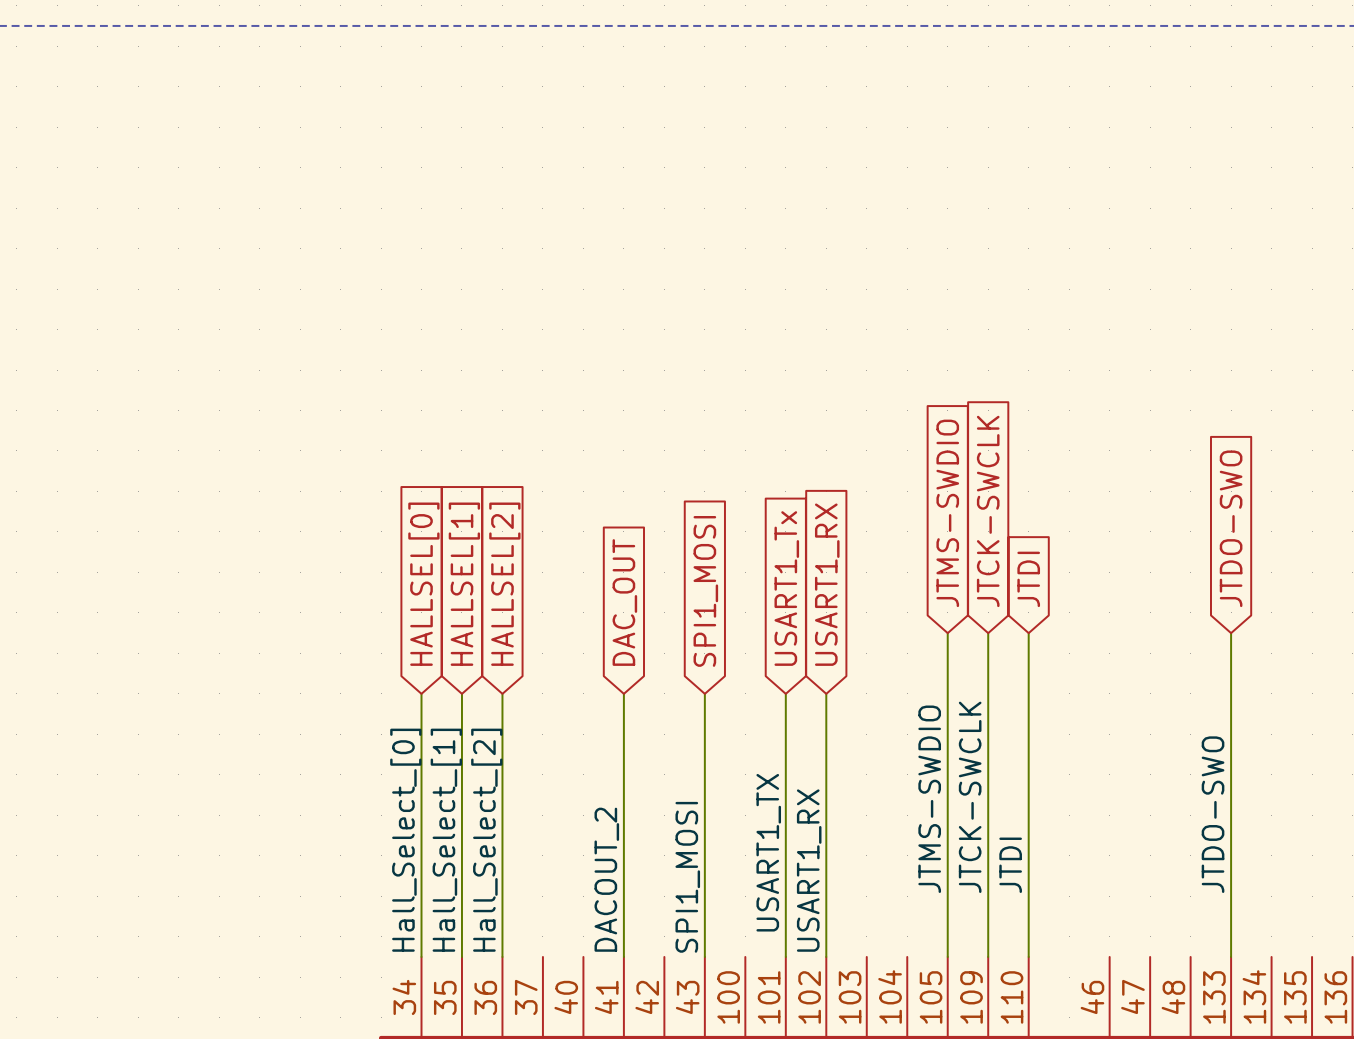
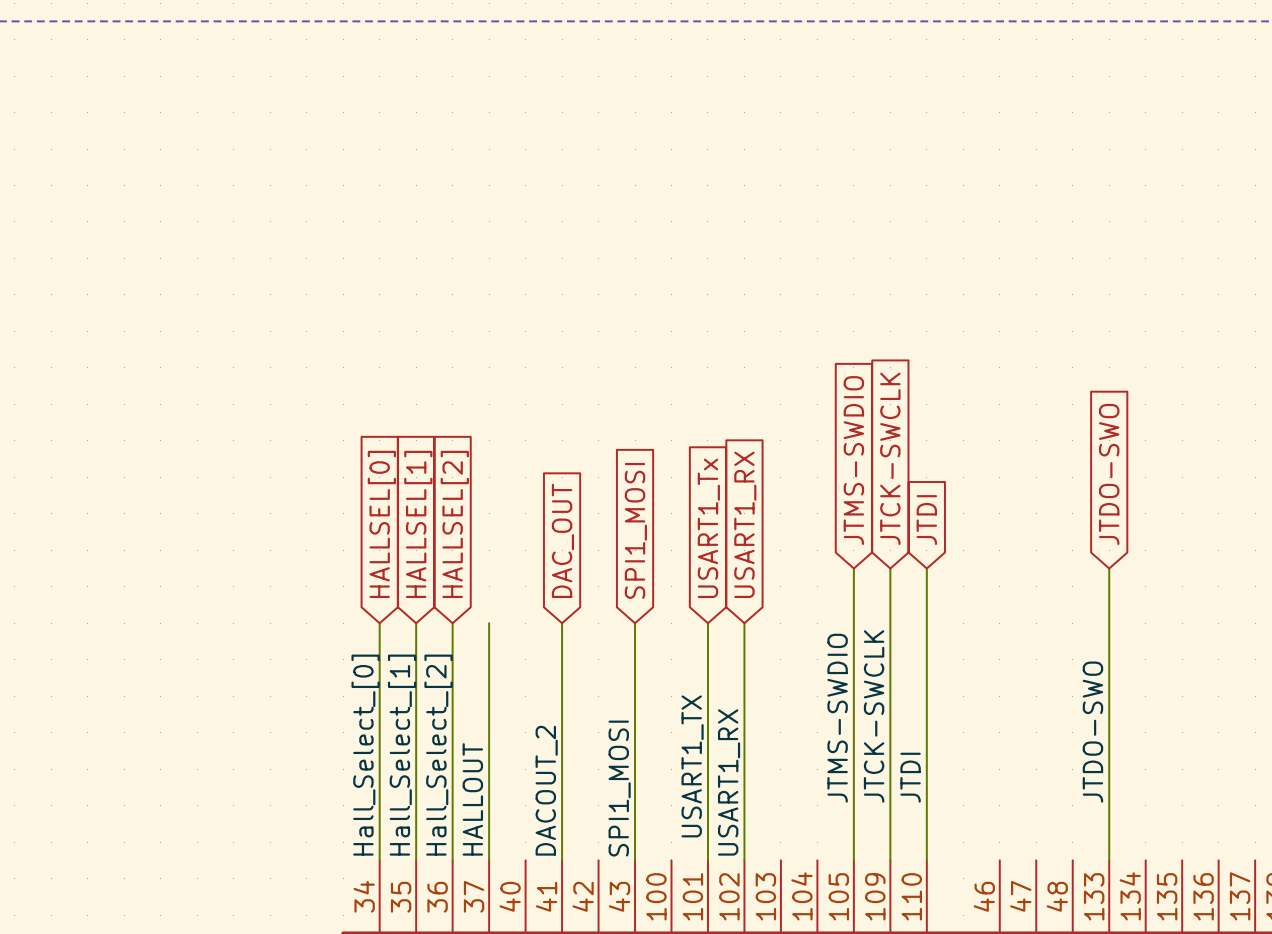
wire: none -> (489, 623) (489, 860)
label: none -> HALLOUT (472, 799)

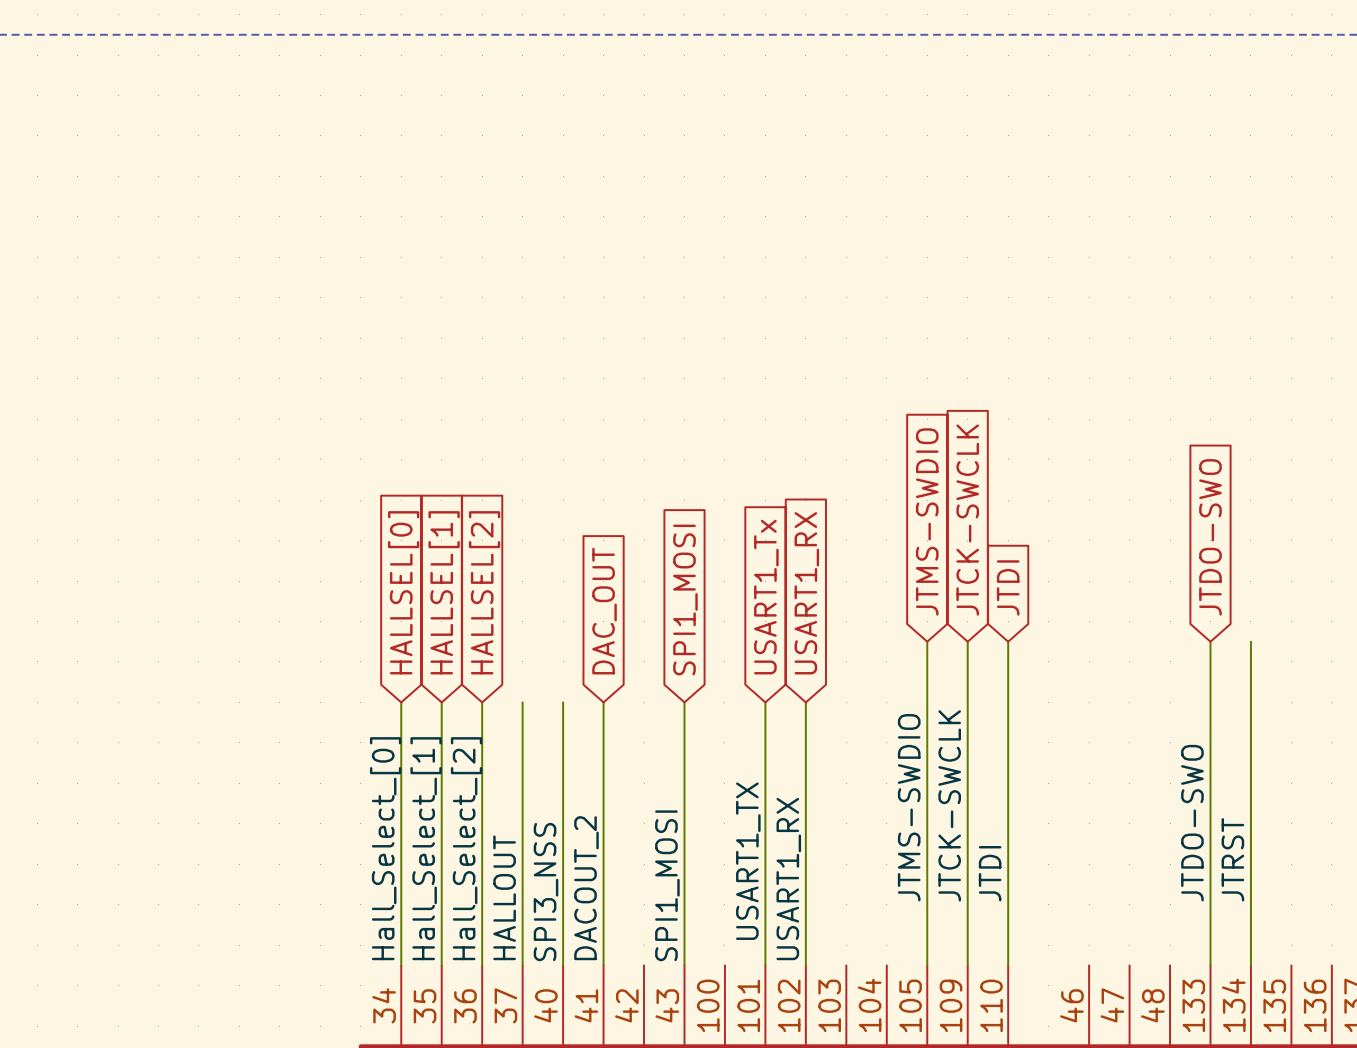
wire: none -> (1250, 641) (1250, 965)
wire: none -> (563, 702) (563, 965)
label: none -> JTRST (1232, 859)
label: none -> SPI3_NSS (546, 892)

